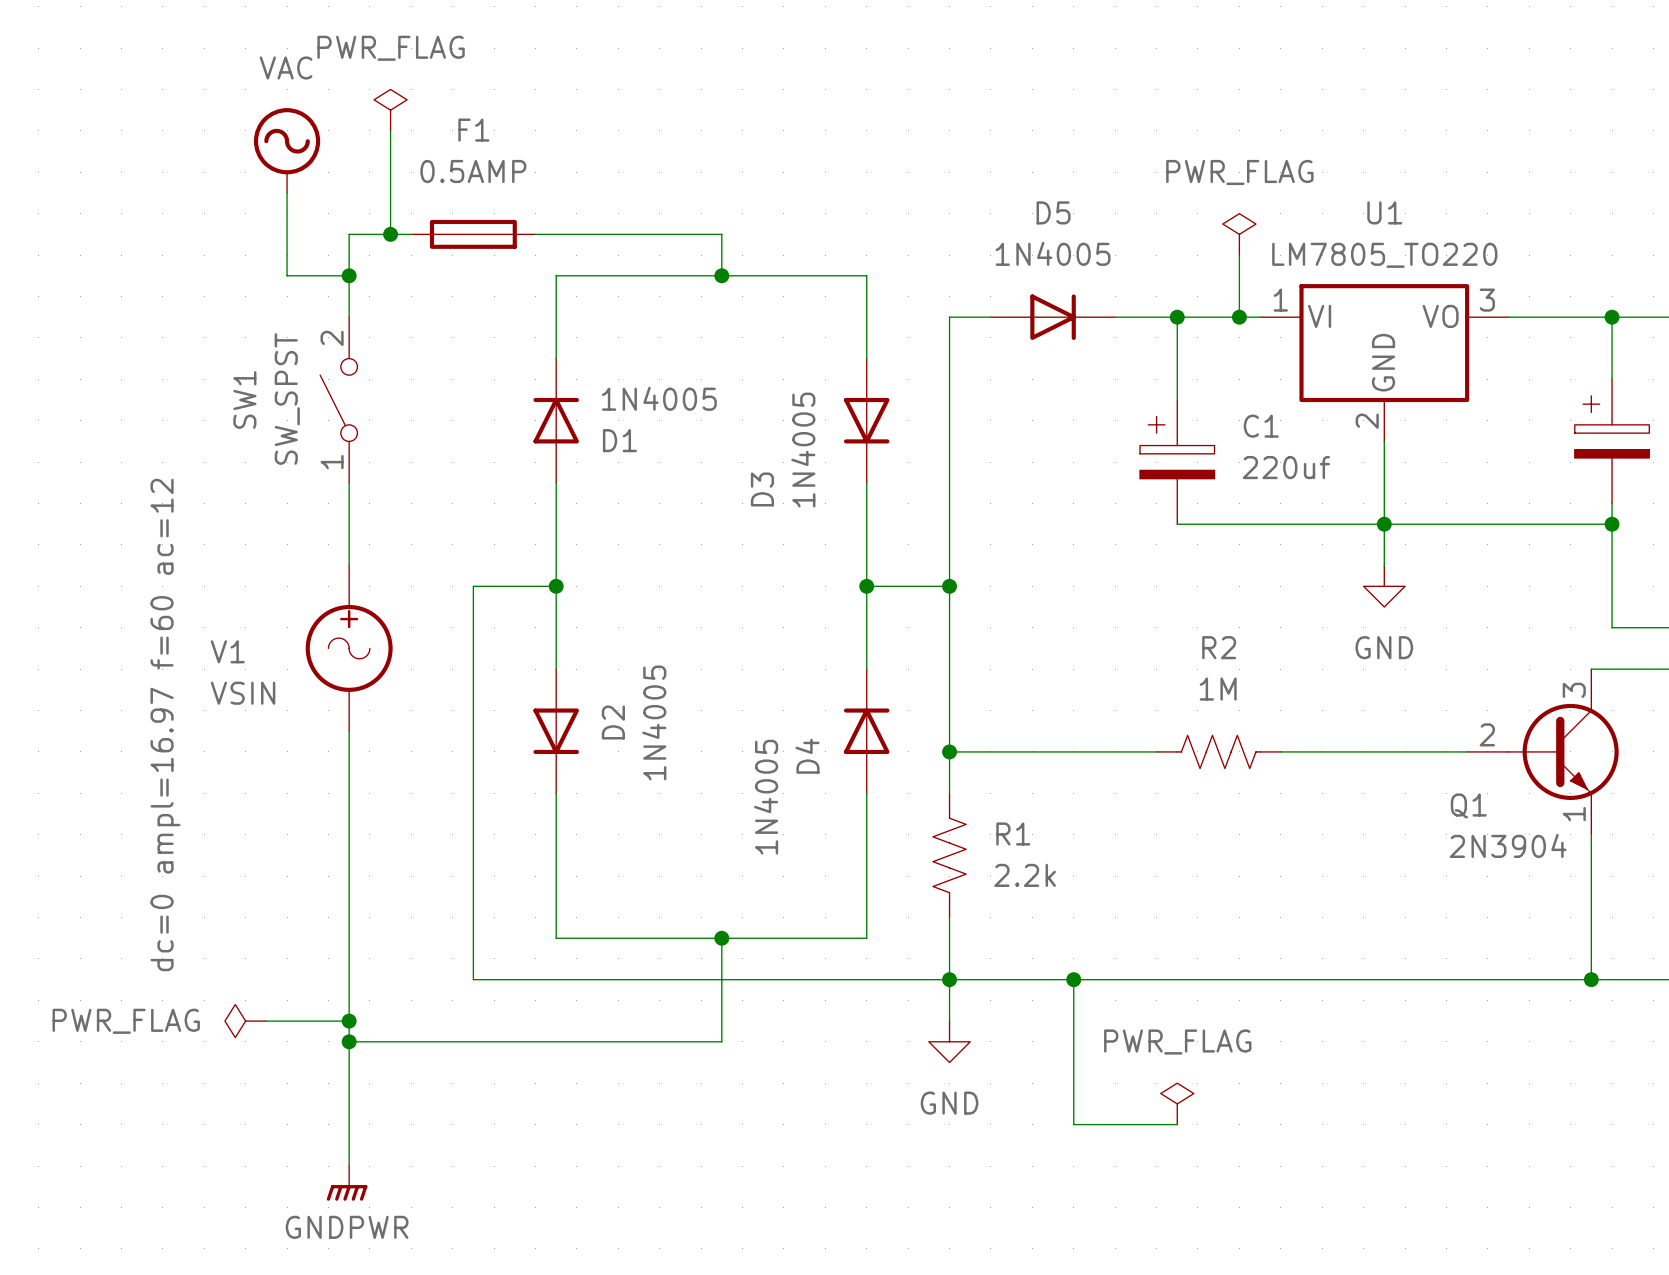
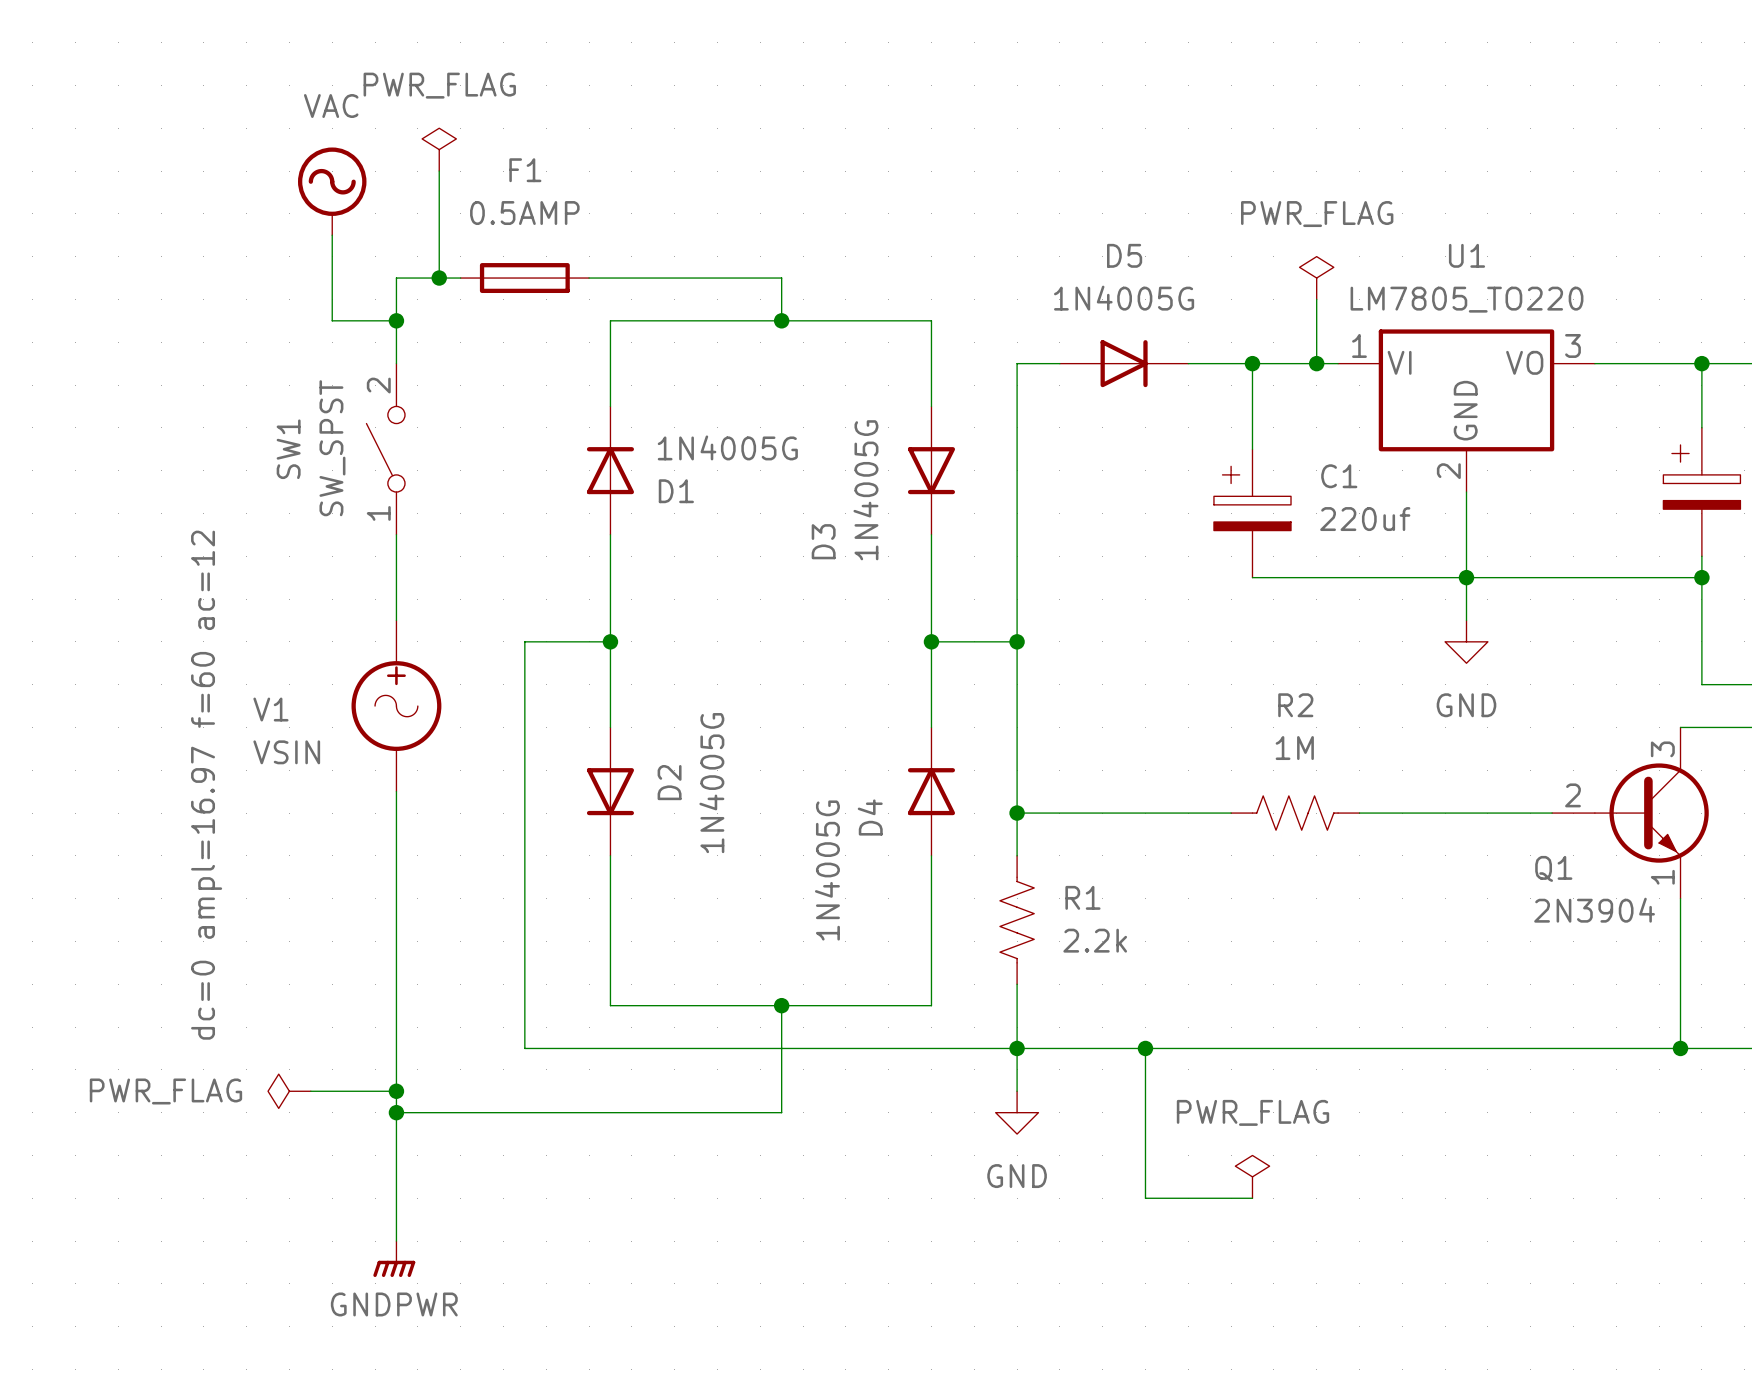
D5 value: 1N4005 (1053, 253) -> 1N4005G (1124, 298)
D1 value: 1N4005 (659, 398) -> 1N4005G (727, 447)
D3 value: 1N4005 (803, 450) -> 1N4005G (865, 490)
D2 value: 1N4005 (654, 722) -> 1N4005G (711, 783)
D4 value: 1N4005 (766, 797) -> 1N4005G (827, 870)

